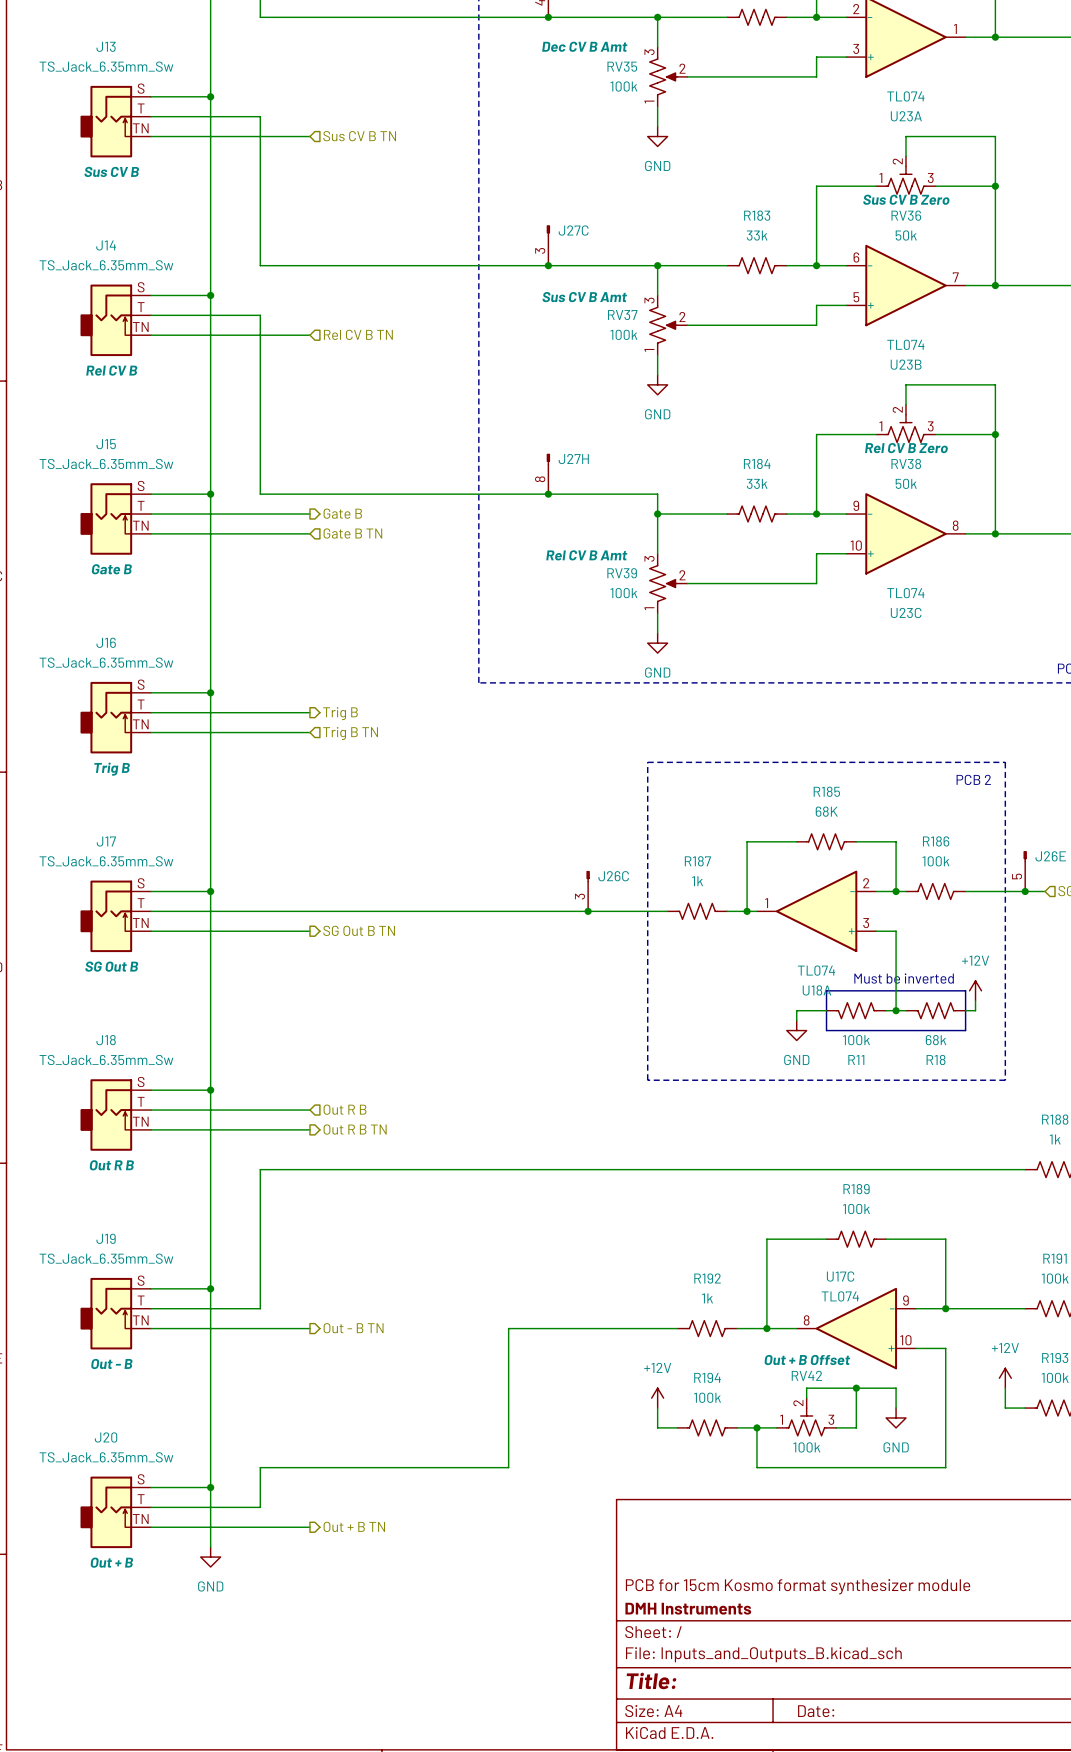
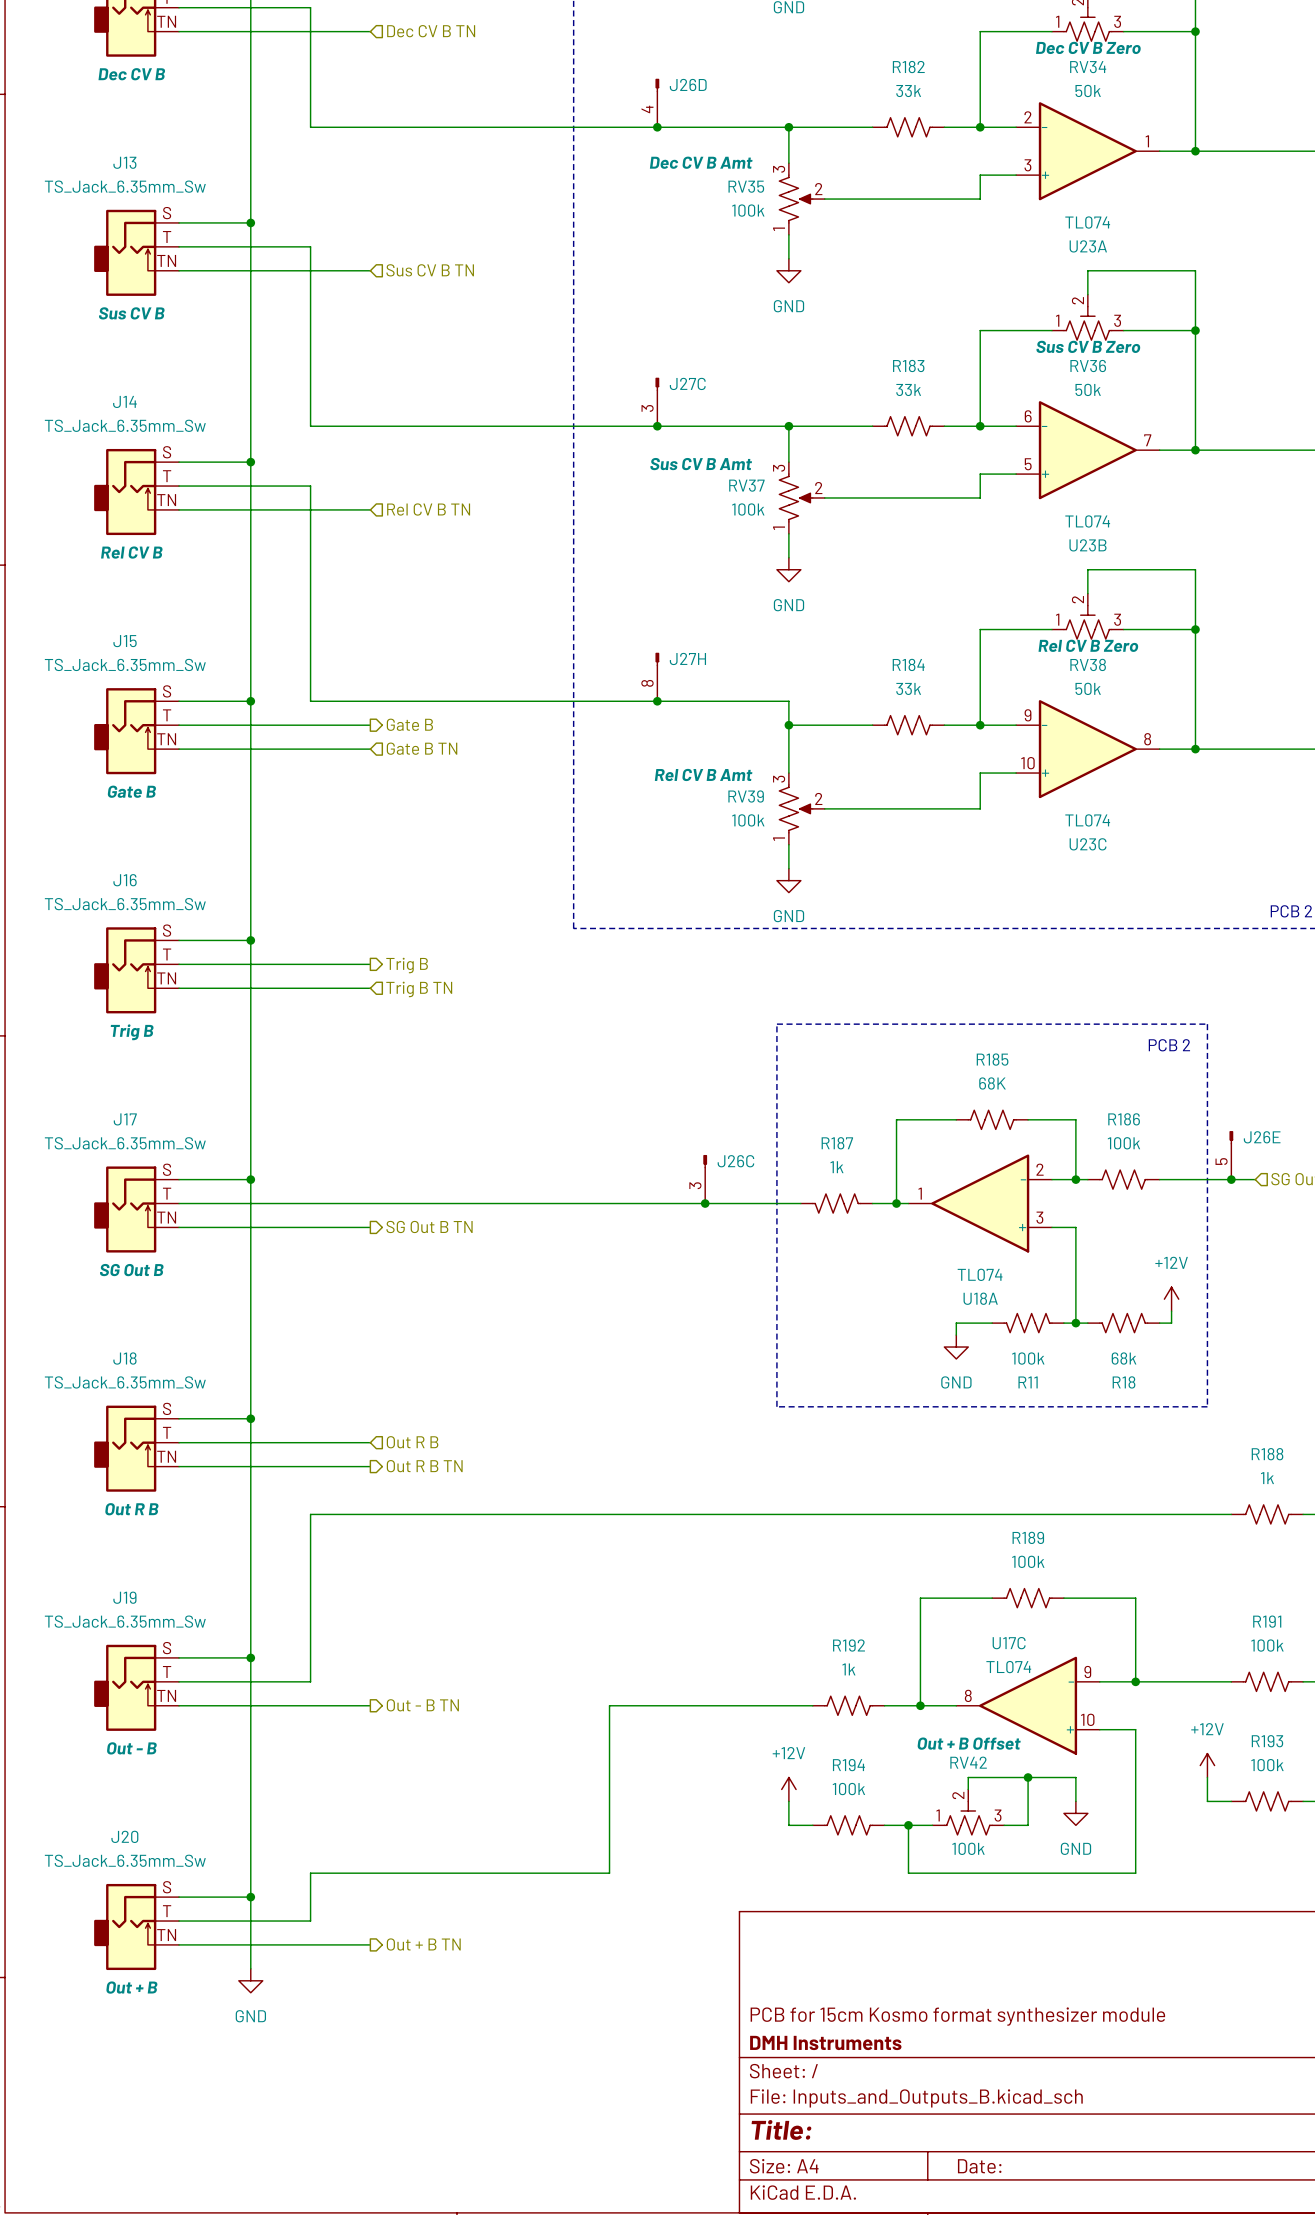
text: Must be inverted (904, 978) -> none
line: (826, 990) (965, 990) (965, 1030) (826, 1030) (826, 990) -> none

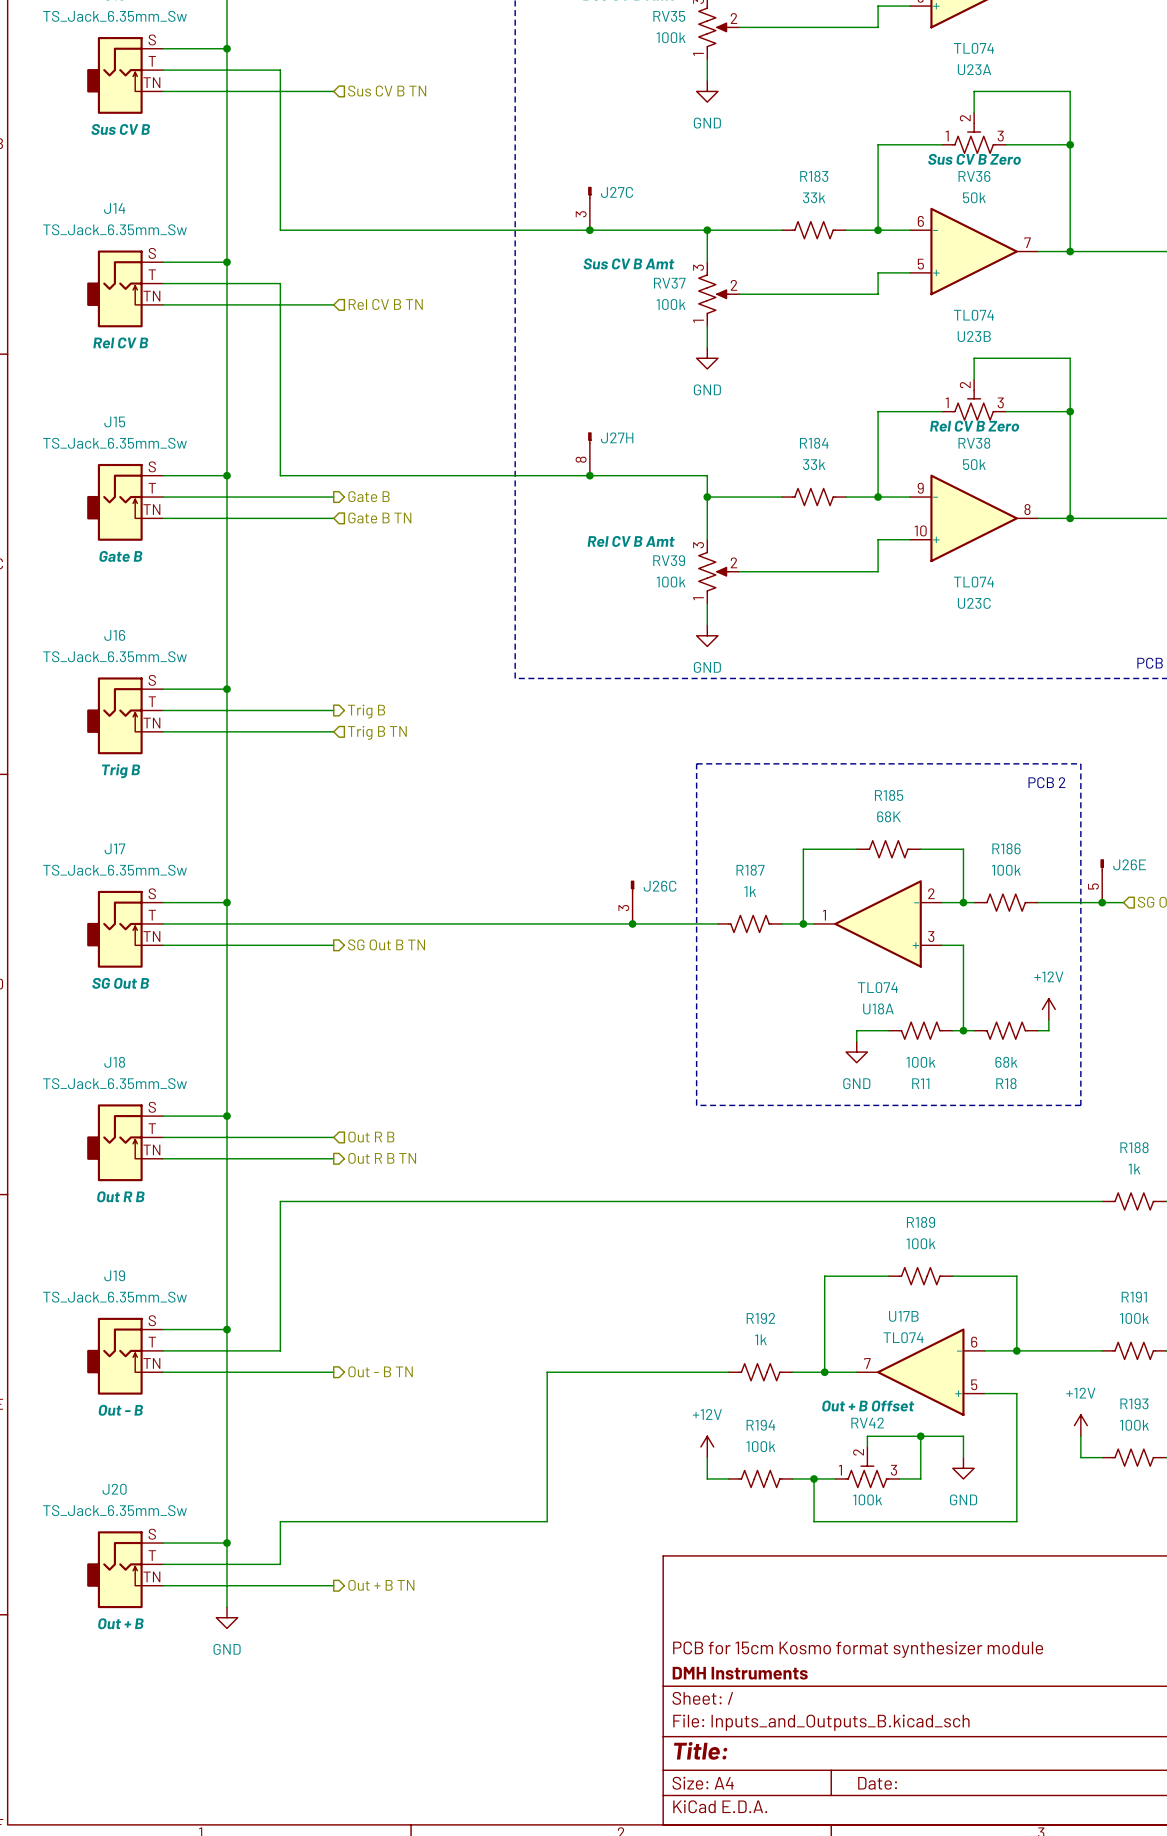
U17C name: U17C (1009, 1643) -> U17B (903, 1316)
U17C pin number: 9 (1087, 1671) -> 6 (974, 1342)
U17C pin number: 8 (968, 1695) -> 7 (867, 1363)
U17C pin number: 10 (1087, 1719) -> 5 (974, 1384)

